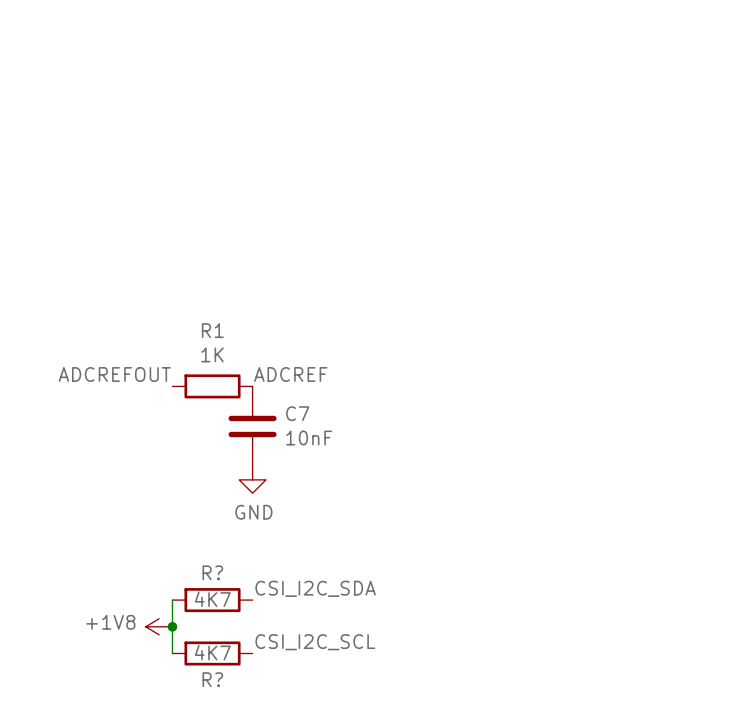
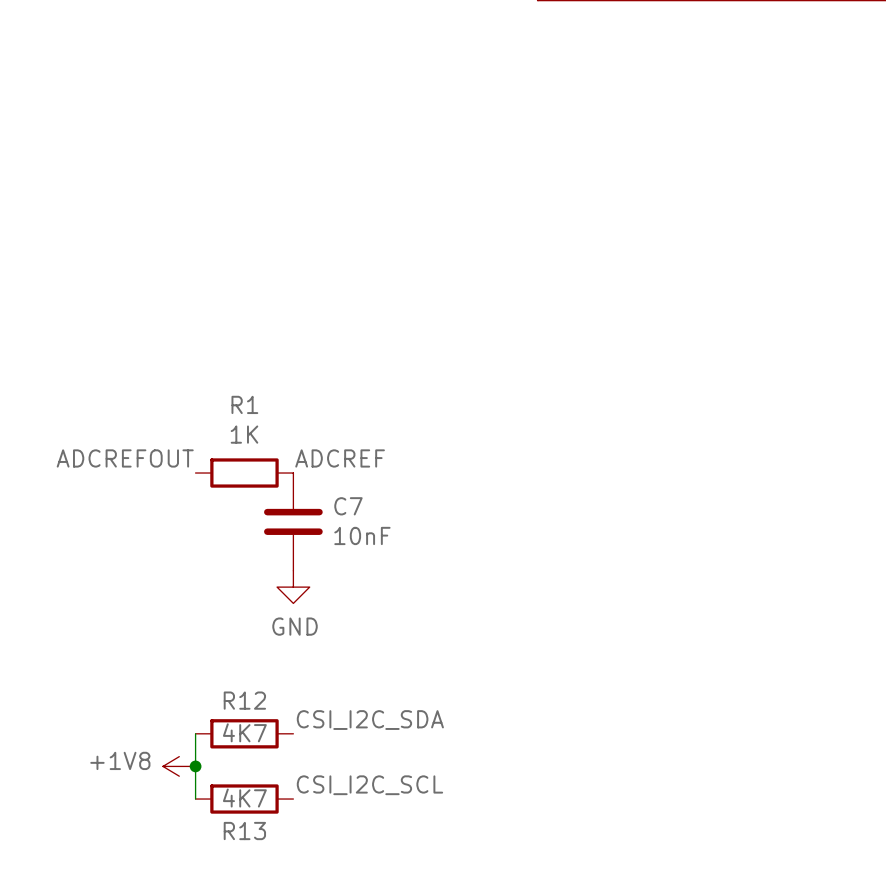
R? name: R? (212, 572) -> R12 (244, 700)
R? name: R? (212, 679) -> R13 (244, 831)

